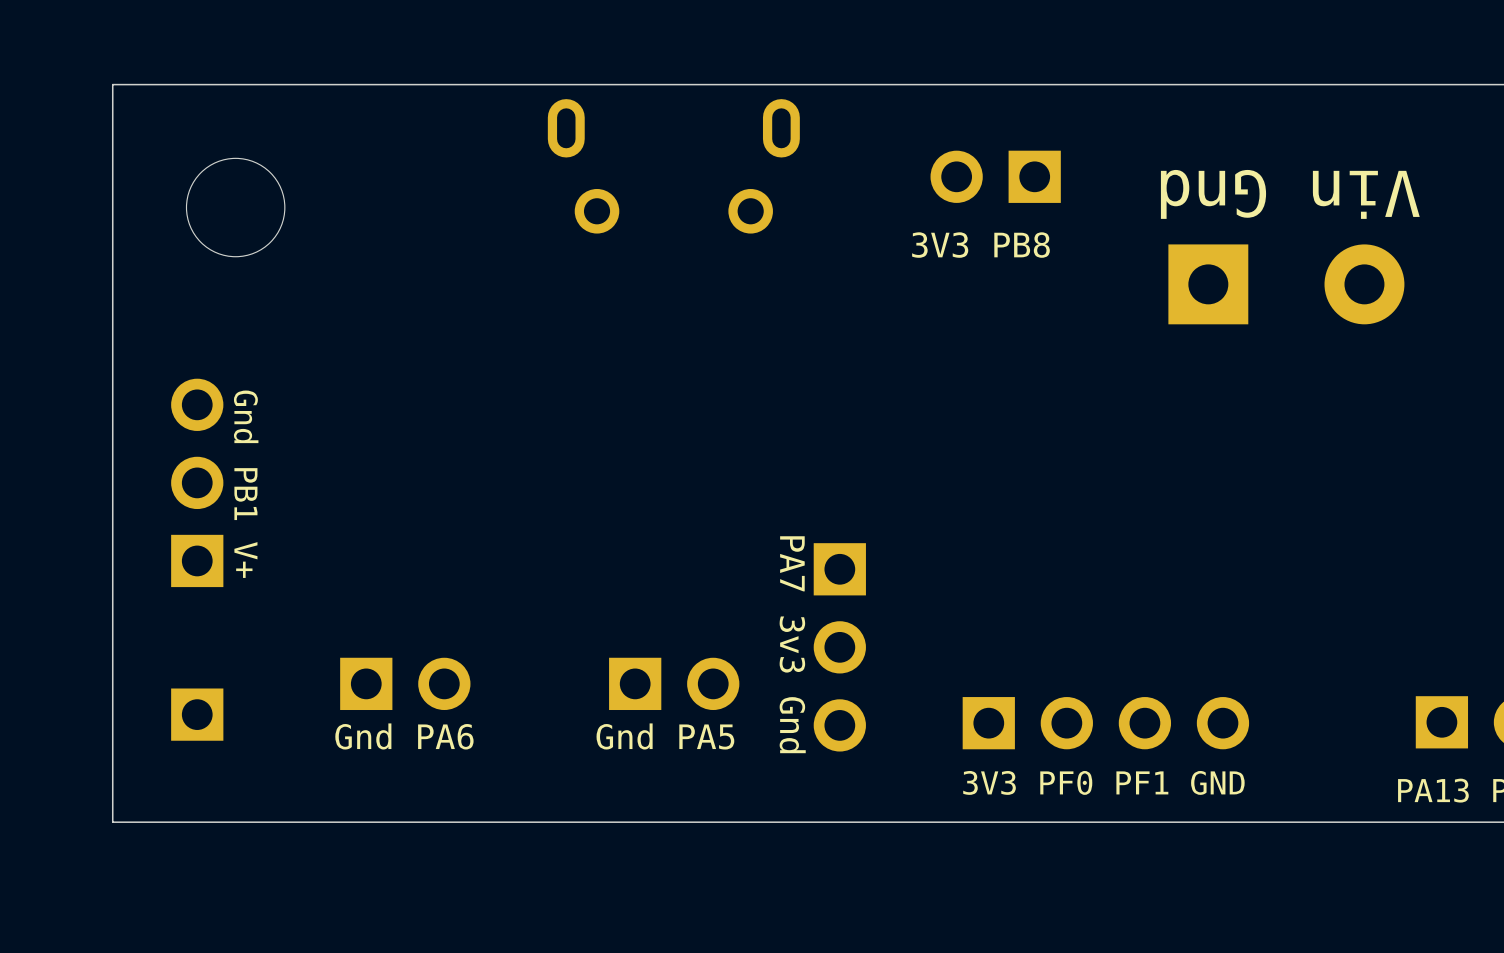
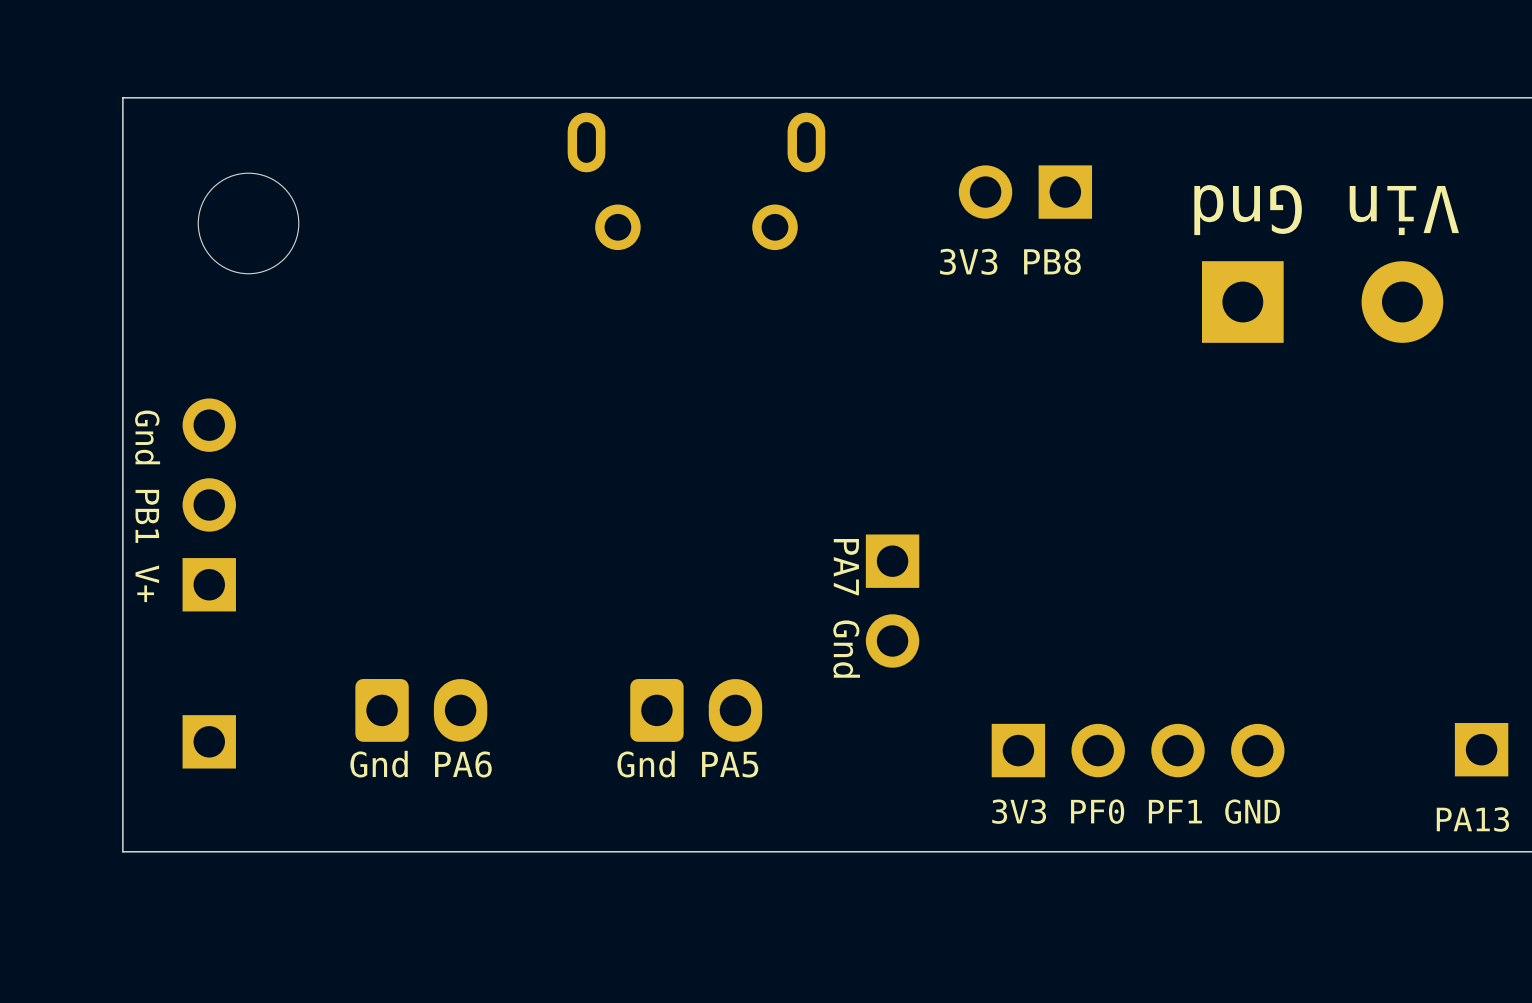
text position: Gnd PB1 V+ (246, 484) -> Gnd PB1 V+ (147, 506)
part: none -> (892, 601)
text: PA7 3v3 Gnd (792, 644) -> PA7 Gnd (846, 608)
part: (839, 647) -> none
part footprint: [340, 657, 471, 711] -> [355, 679, 488, 742]
part footprint: [609, 657, 740, 711] -> [630, 679, 763, 742]

